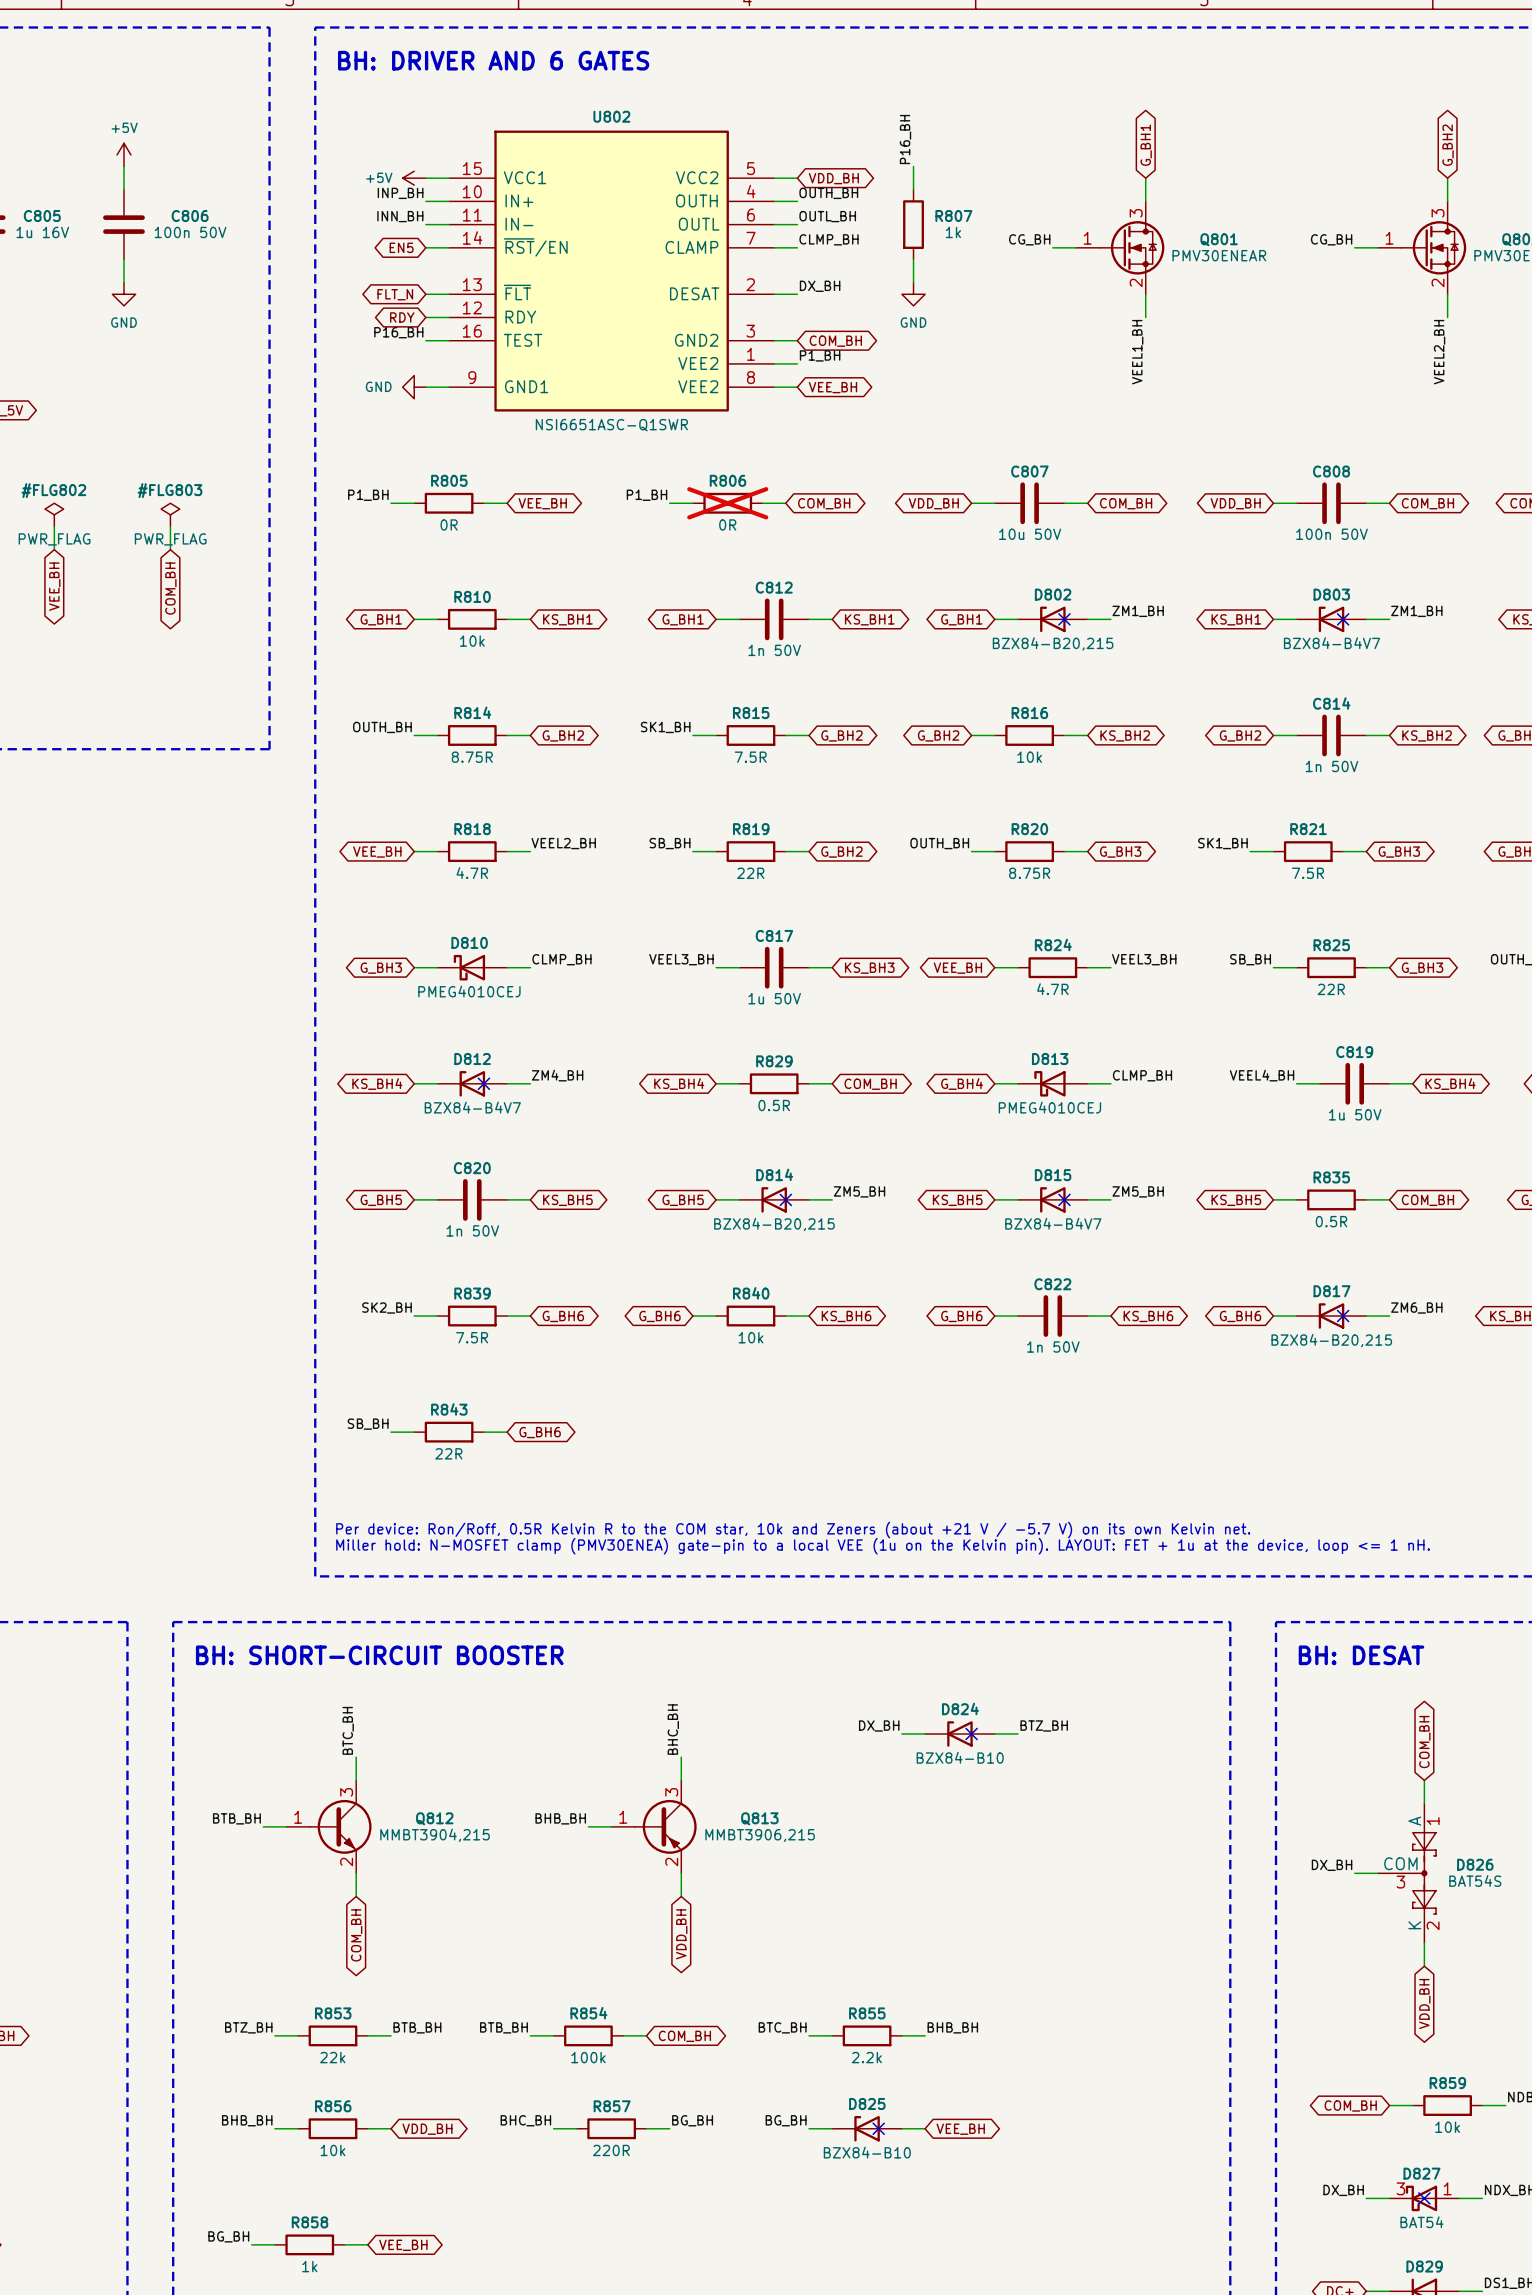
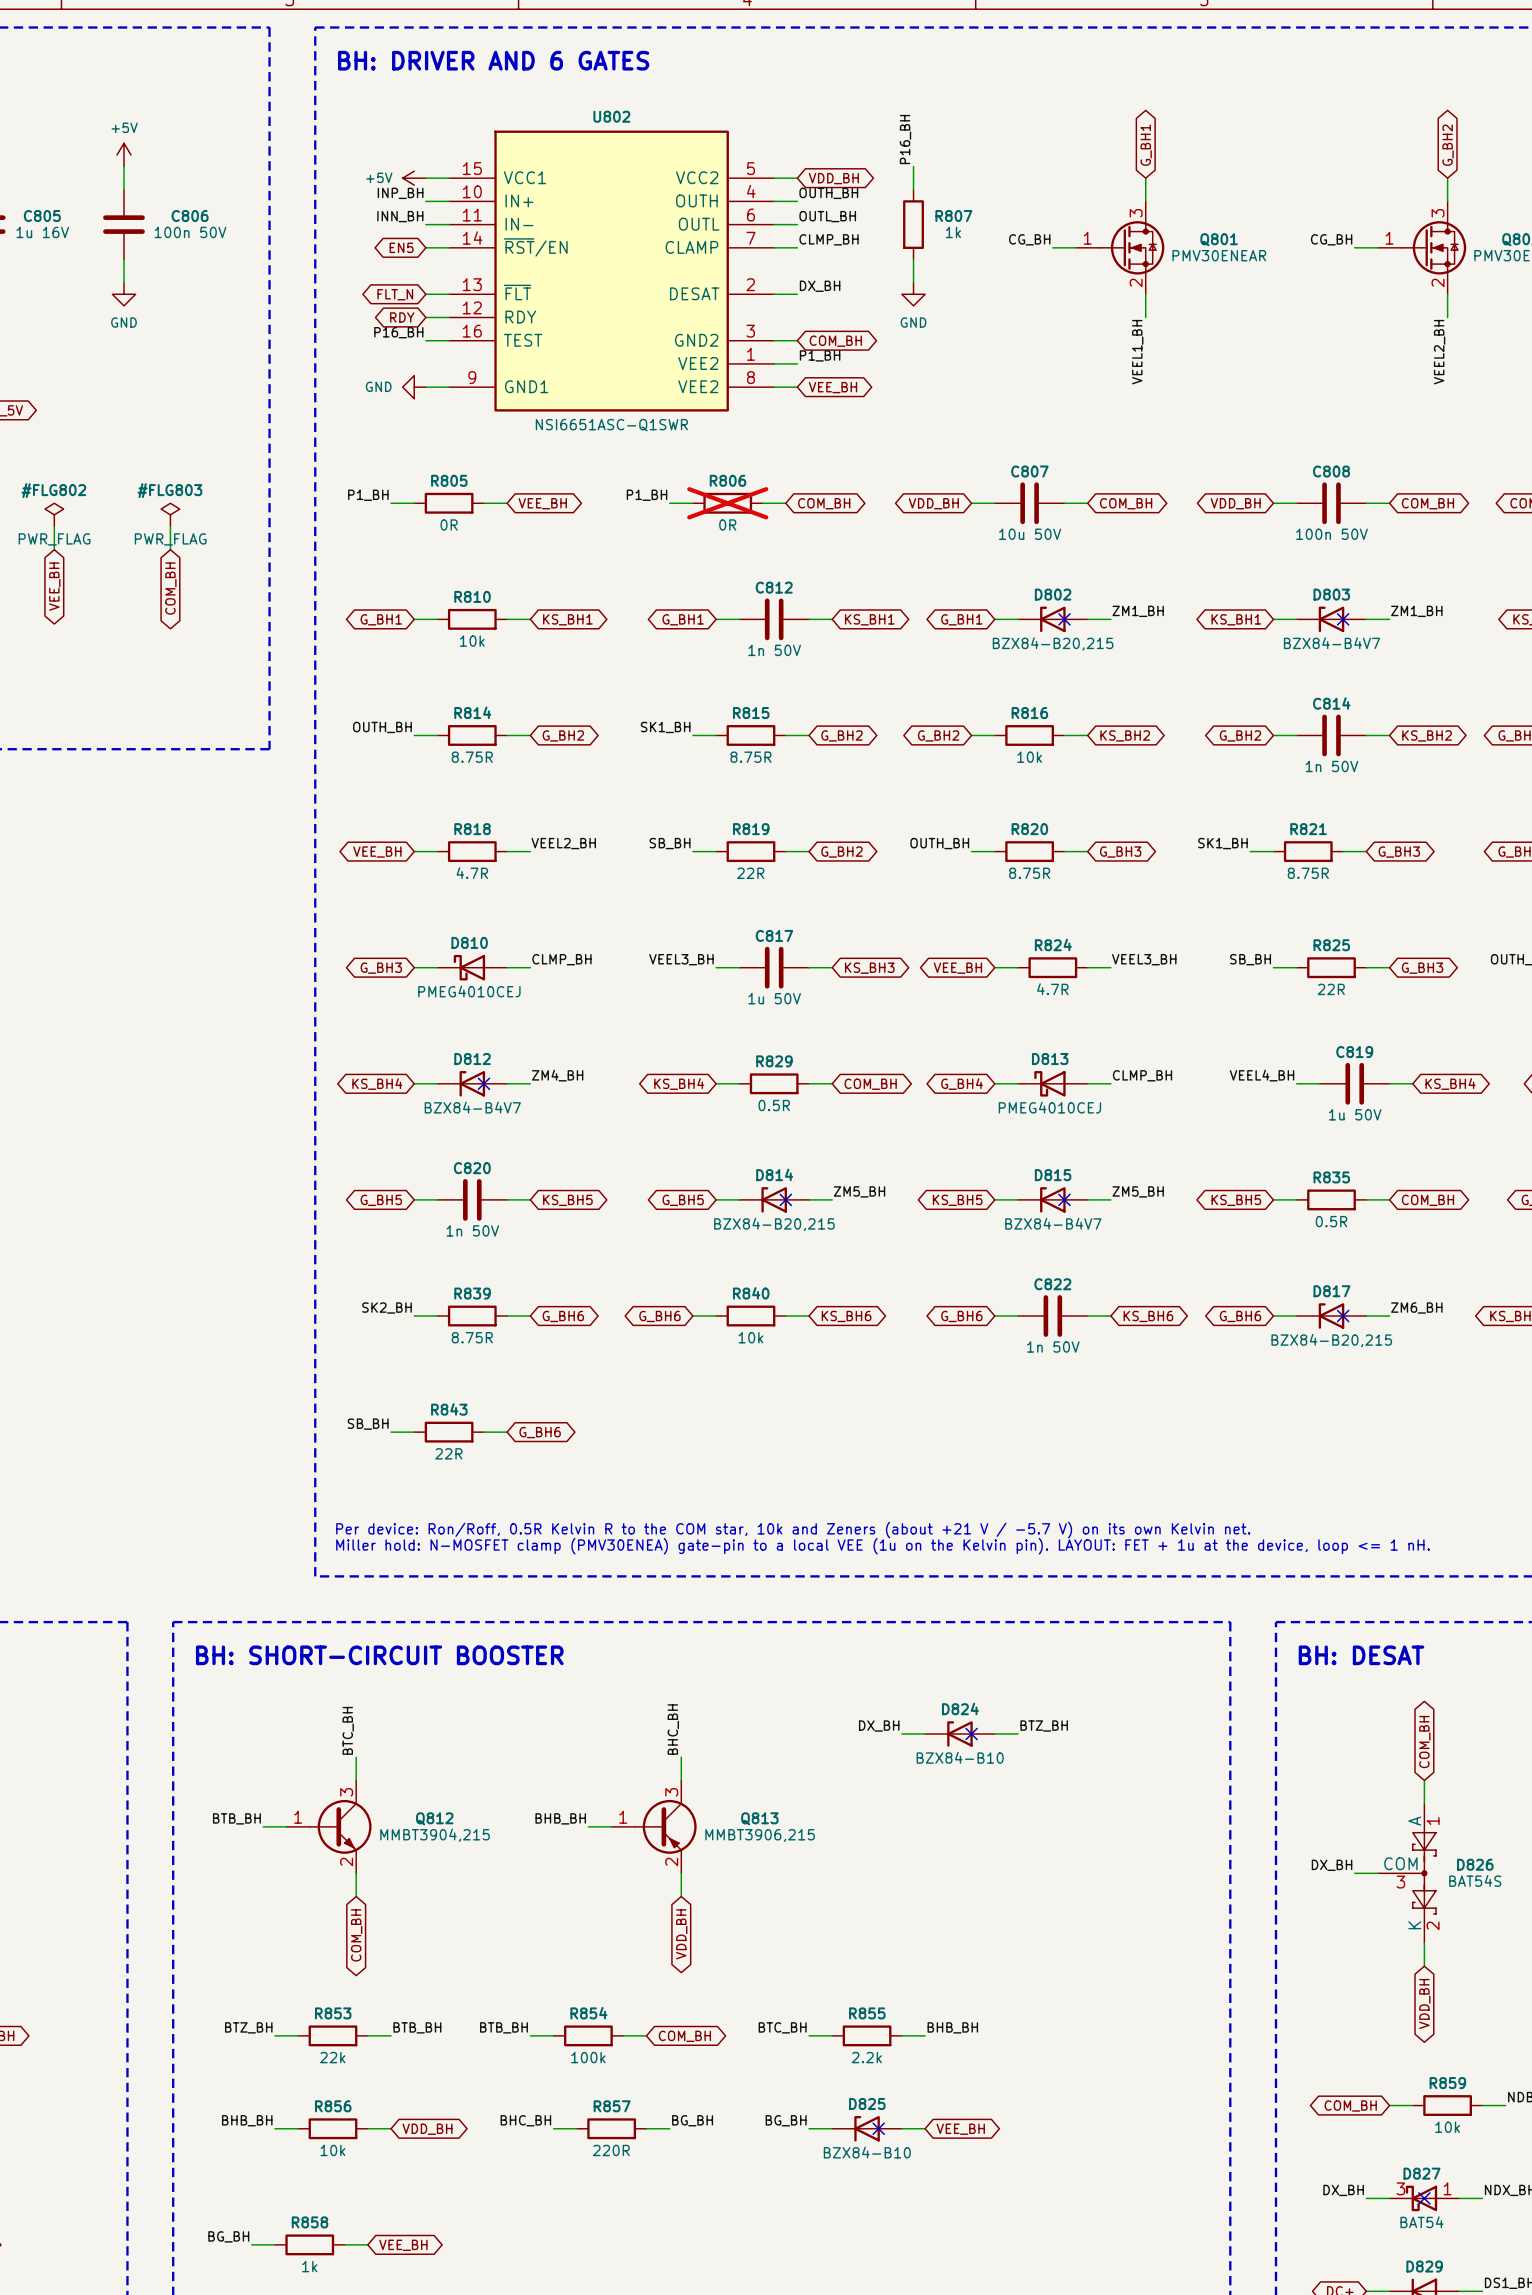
R815 value: 7.5R (750, 757) -> 8.75R (750, 757)
R821 value: 7.5R (1308, 873) -> 8.75R (1308, 873)
R839 value: 7.5R (472, 1337) -> 8.75R (472, 1337)

